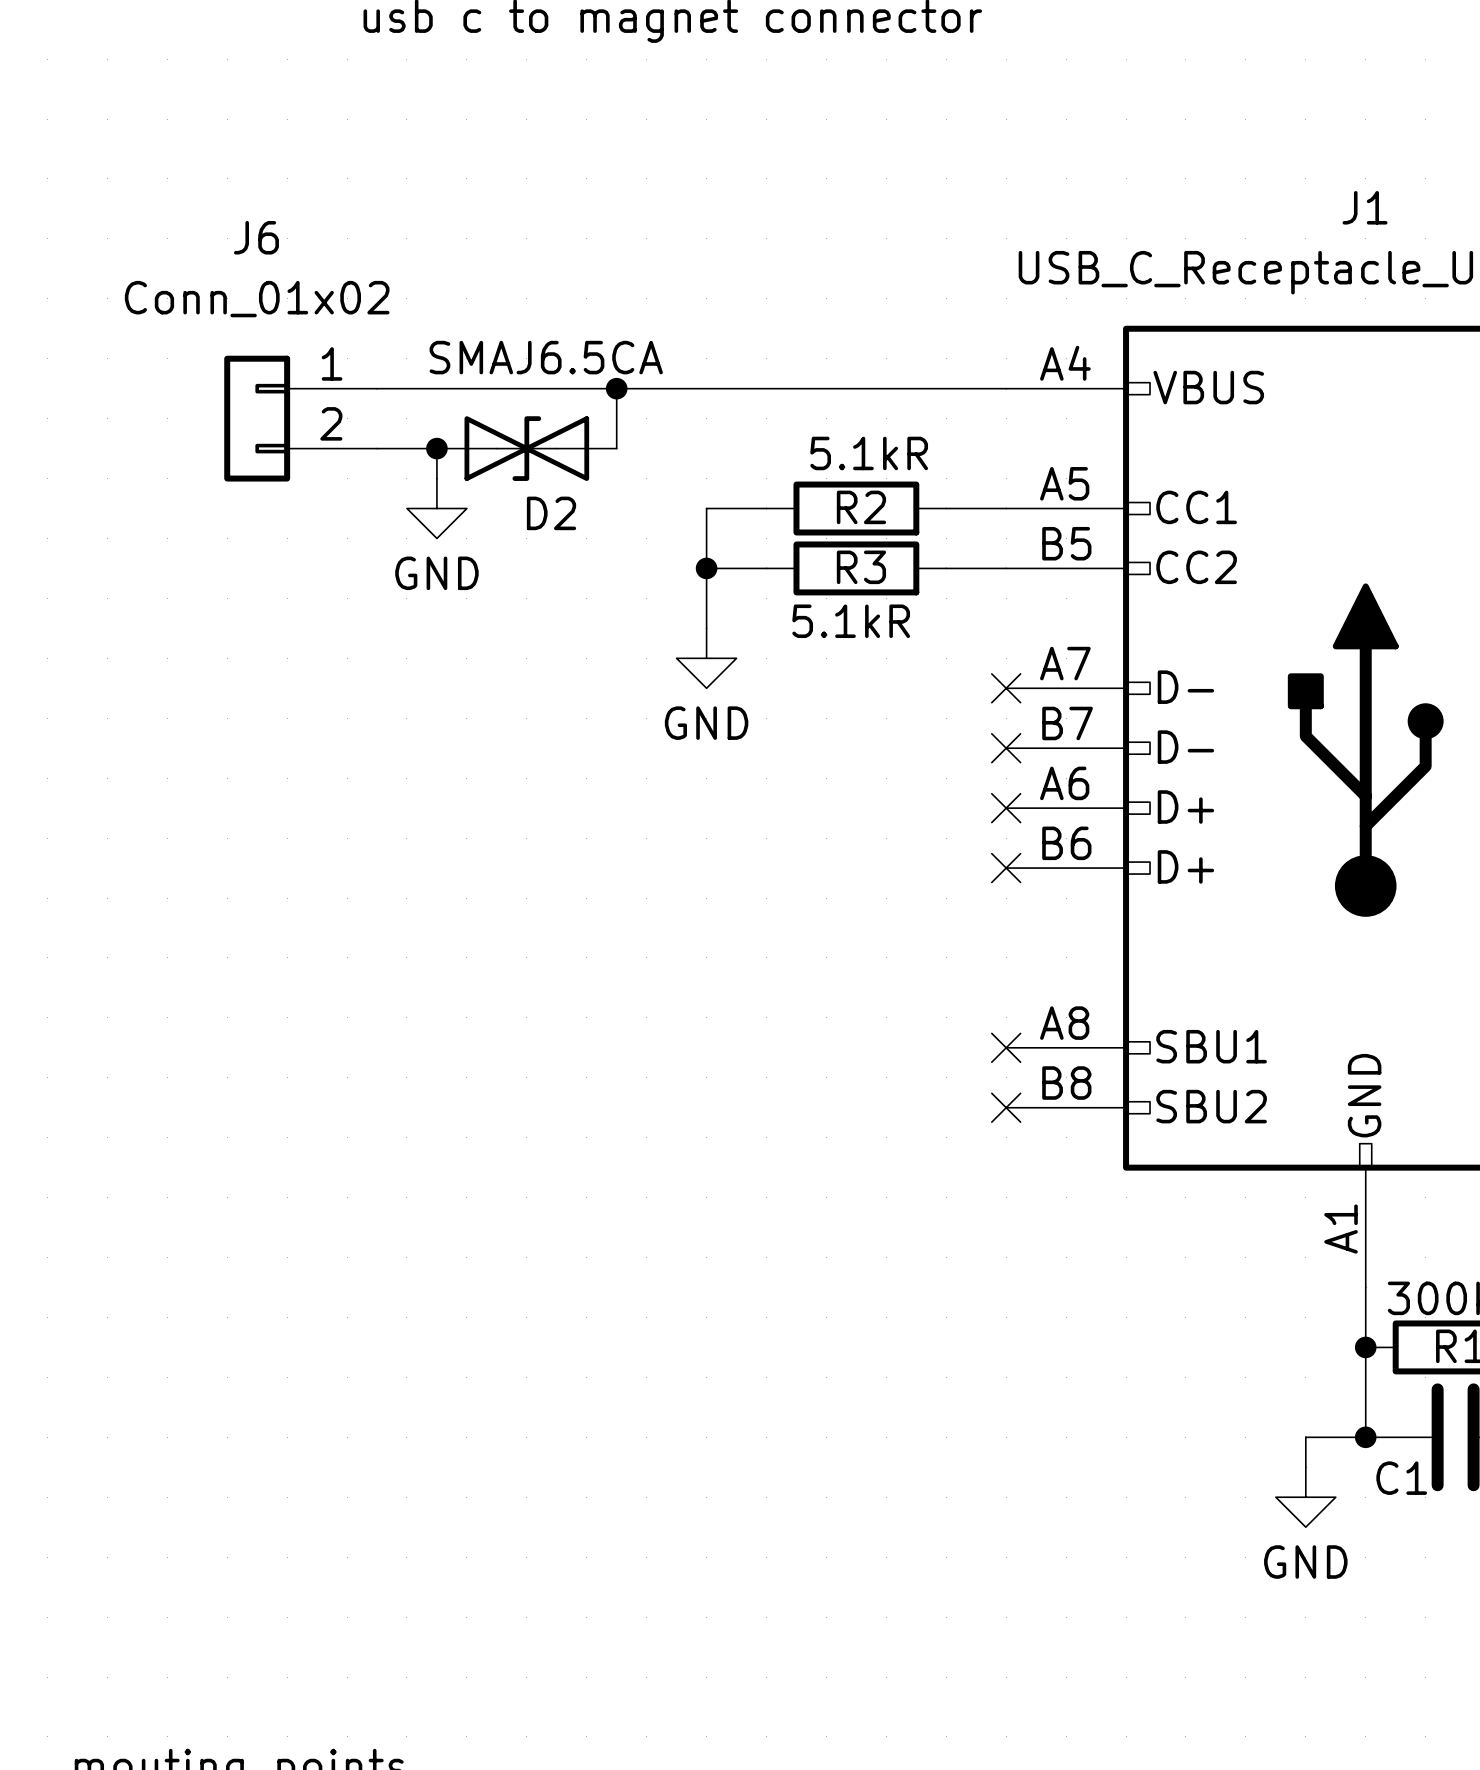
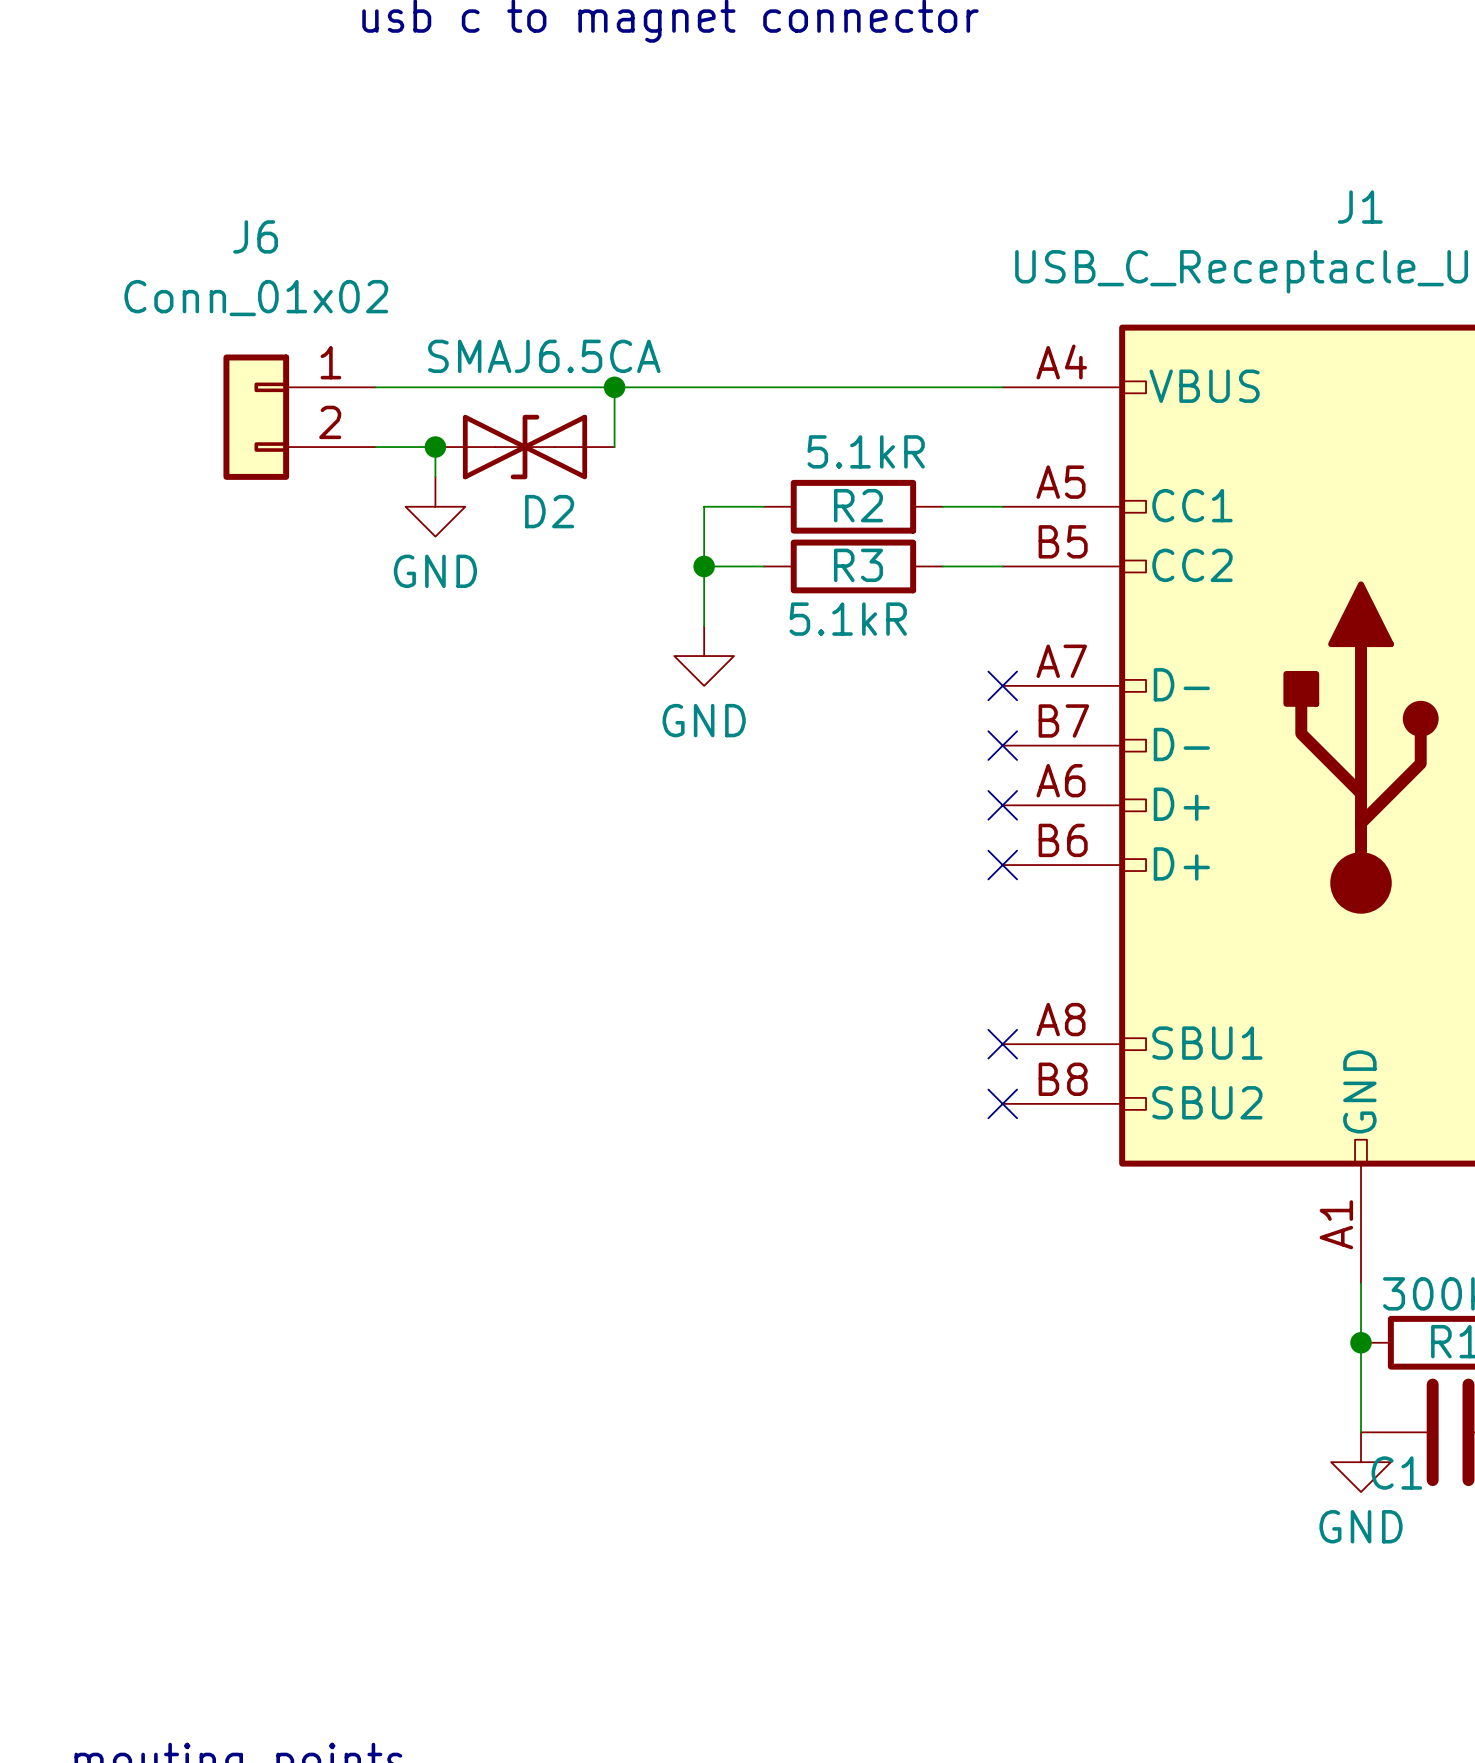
wire: (1365, 1437) (1305, 1437) (1305, 1467) -> none
junction: (1365, 1437) -> none
power symbol position: GND (1305, 1497) -> GND (1361, 1462)

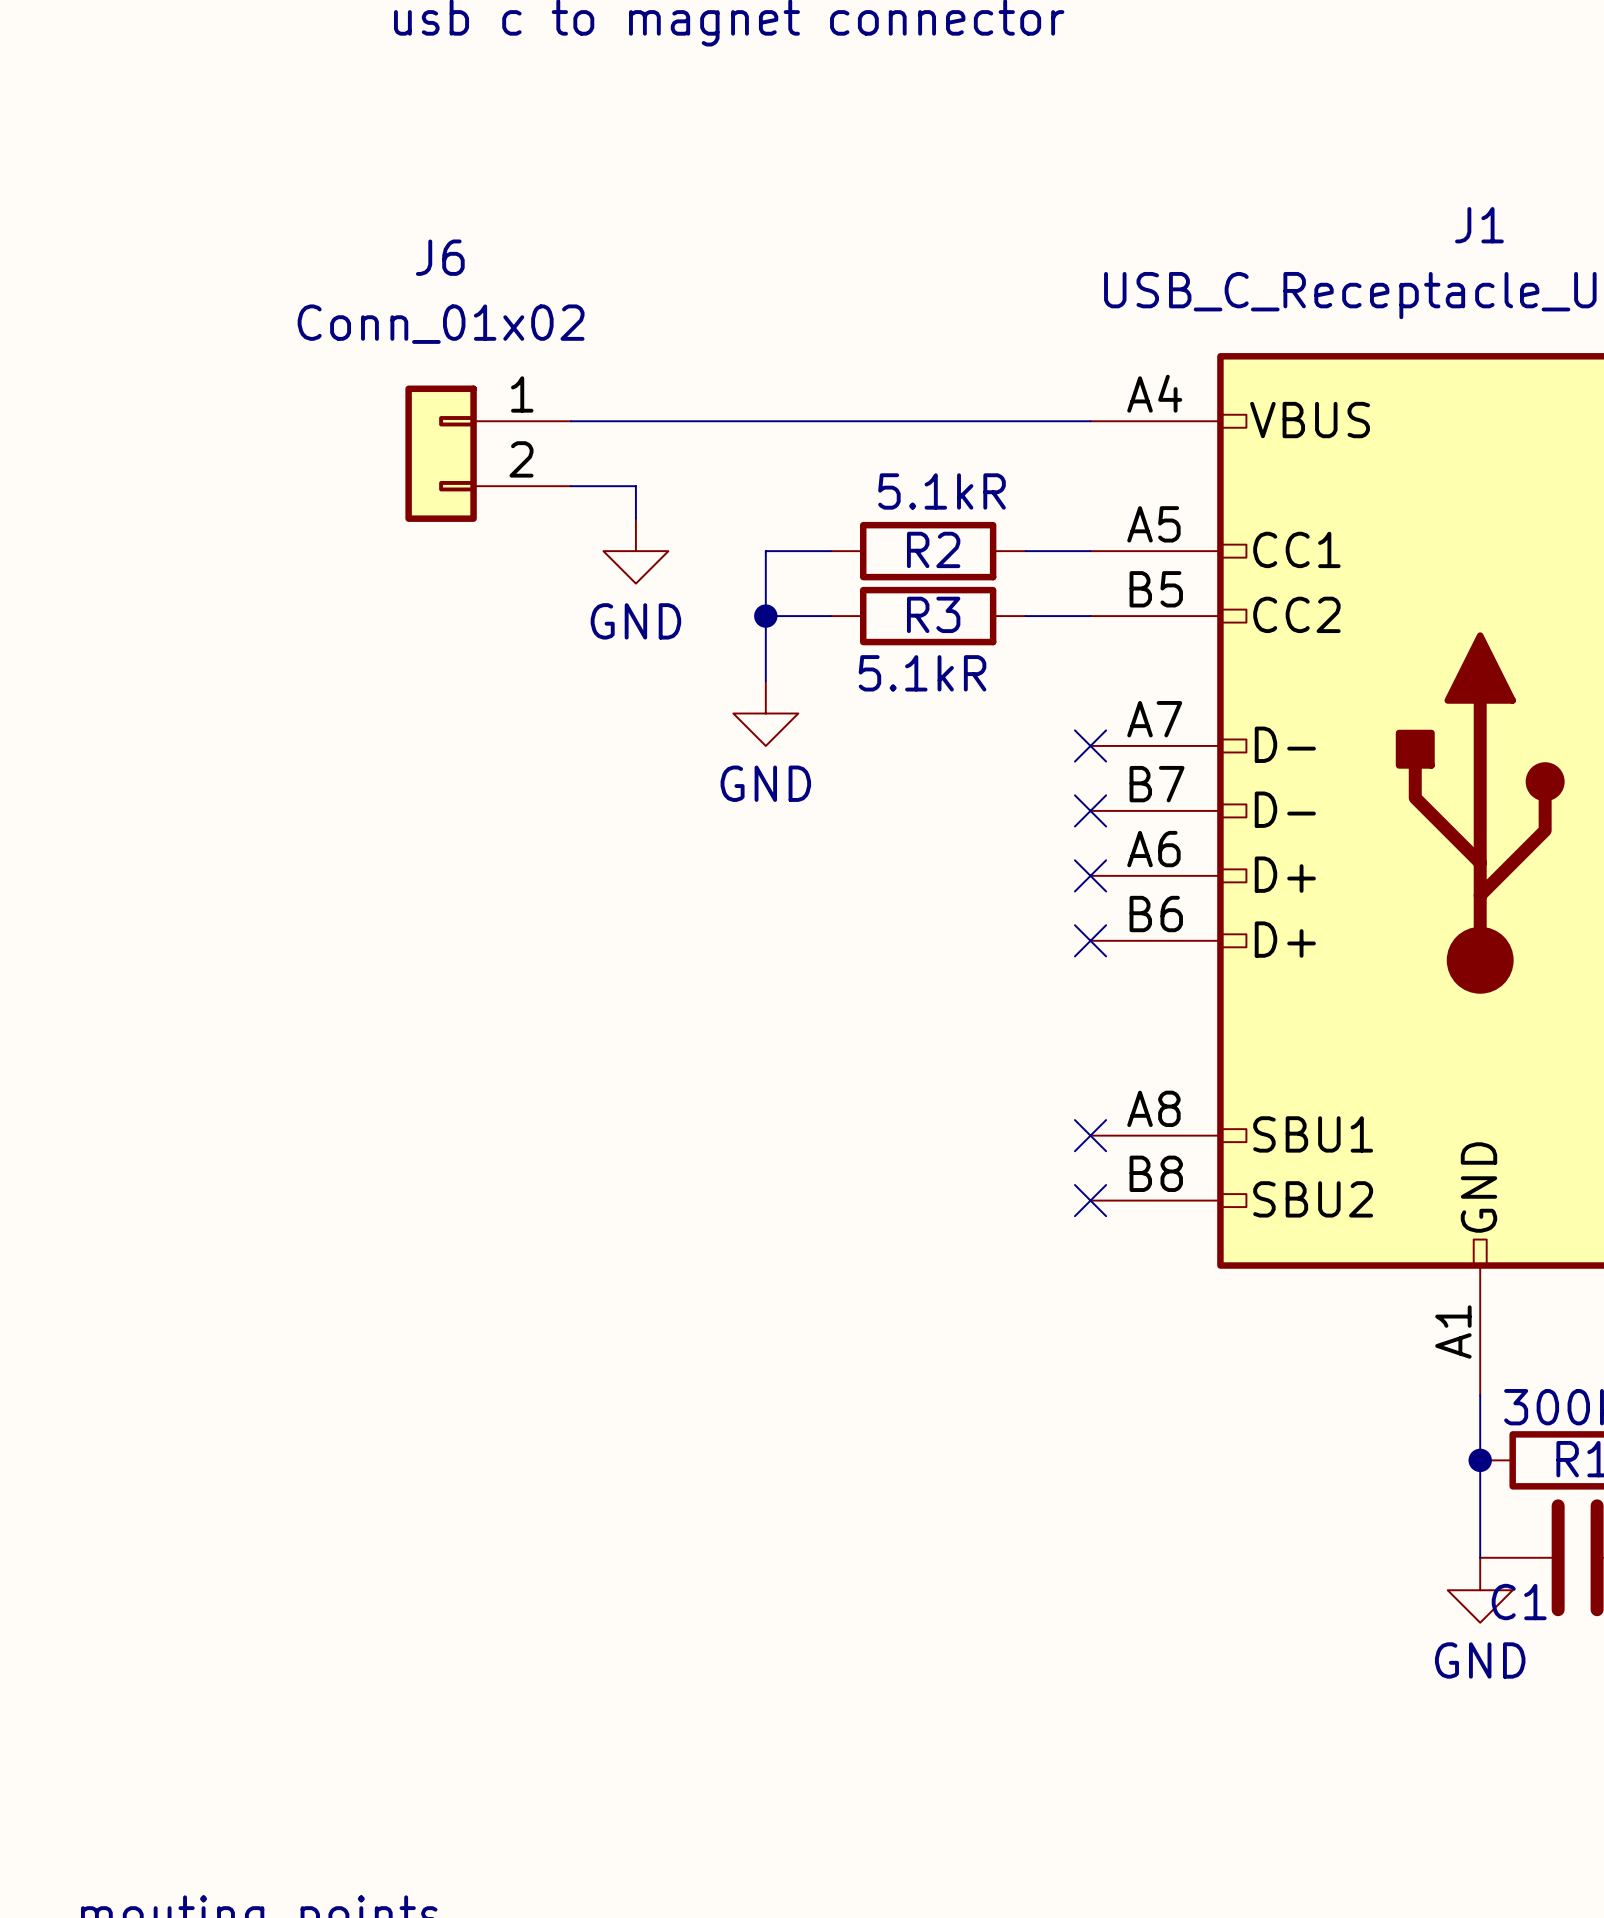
wire: (614, 387) (614, 447) -> none
junction: (614, 387) -> none
J6 position: (299, 417) -> (488, 453)
junction: (435, 447) -> none
D2: SMAJ6.5CA (525, 447) -> none
power symbol position: GND (435, 506) -> GND (635, 551)

